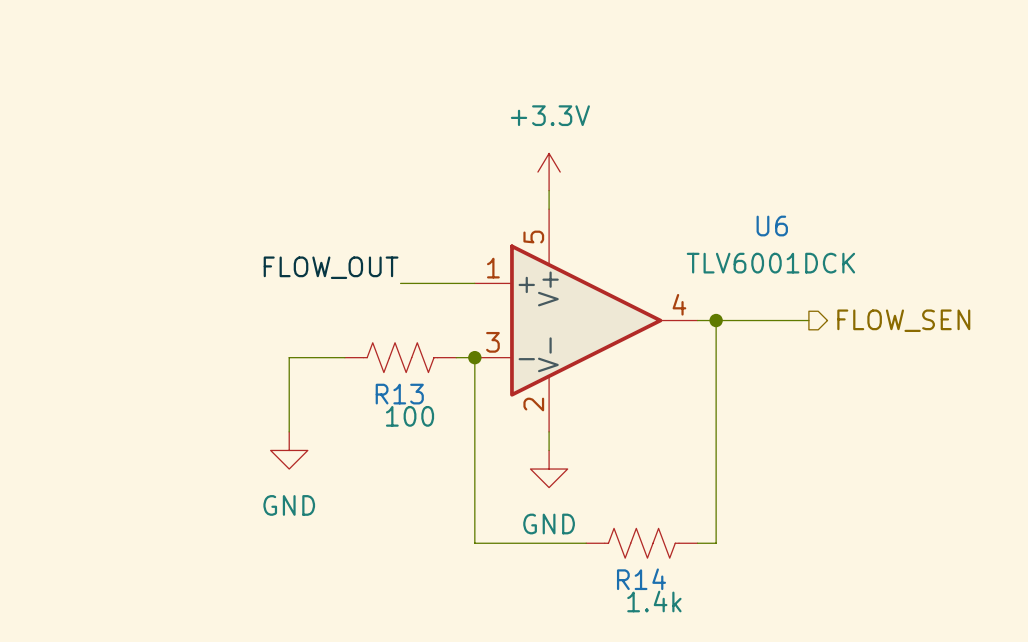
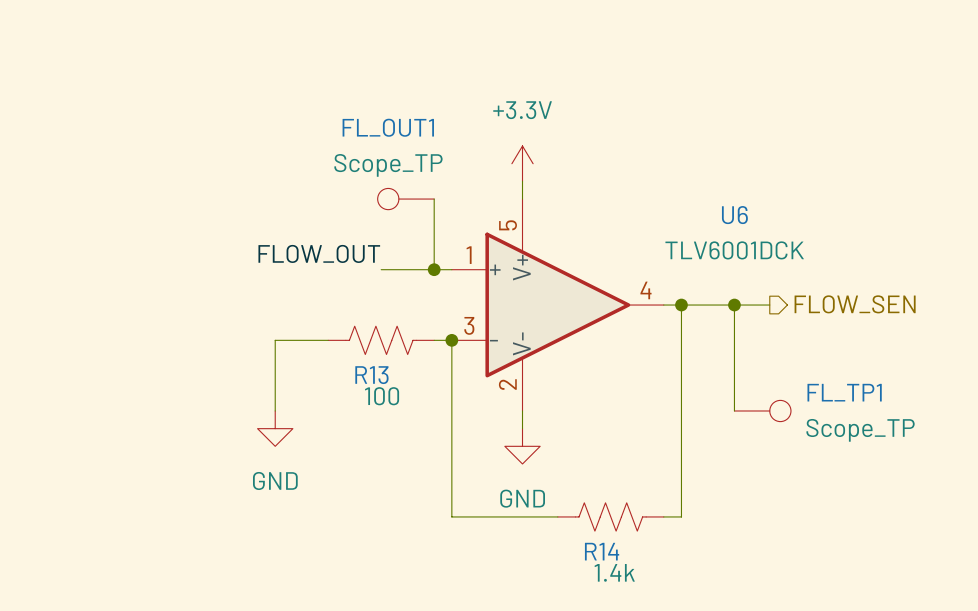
FL_OUT1: none -> Scope_TP (405, 199)
wire: none -> (434, 199) (434, 269)
junction: none -> (434, 269)
wire: none -> (734, 305) (734, 410)
junction: none -> (734, 305)
FL_TP1: none -> Scope_TP (762, 410)

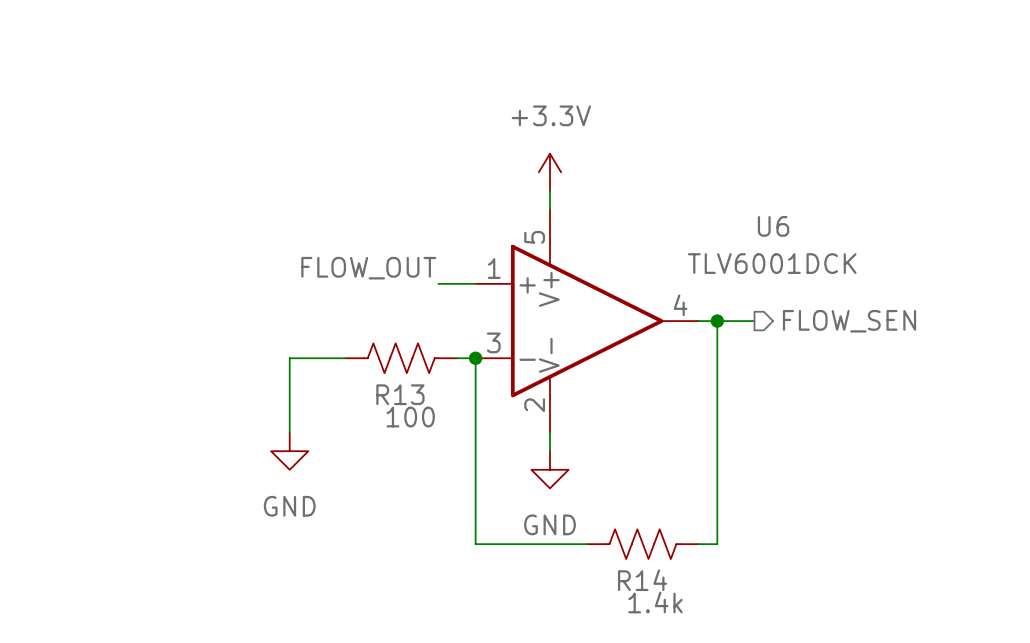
FL_OUT1: Scope_TP (405, 199) -> none
wire: (434, 199) (434, 269) -> none
label position: FLOW_OUT (319, 253) -> FLOW_OUT (368, 268)
wire: (381, 269) (416, 269) -> none
junction: (434, 269) -> none
hierarchical label position: FLOW_SEN (855, 304) -> FLOW_SEN (849, 321)
wire: (716, 305) (769, 305) -> none
wire: (734, 305) (734, 410) -> none
junction: (734, 305) -> none
FL_TP1: Scope_TP (762, 410) -> none

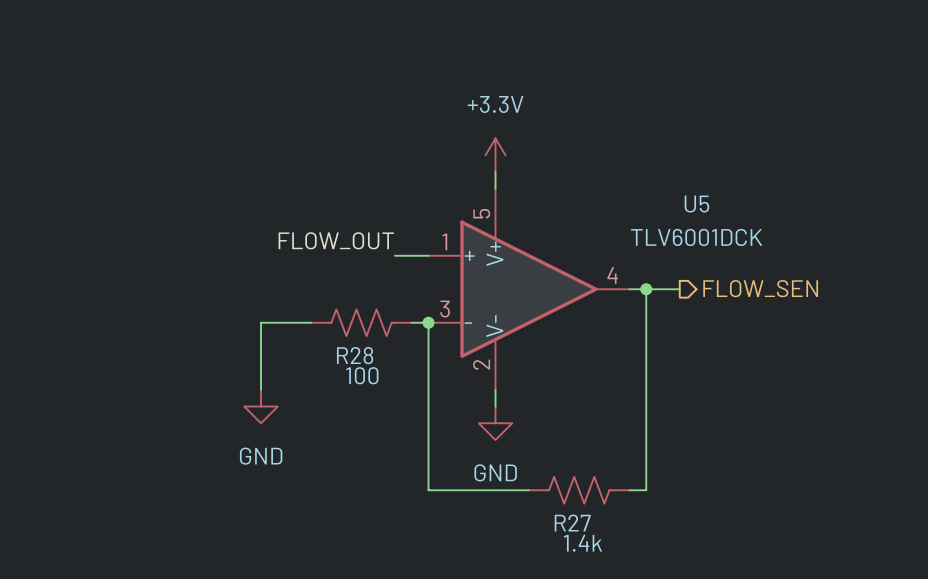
U6 name: U6 (773, 226) -> U5 (696, 204)
R13 name: R13 (400, 394) -> R28 (355, 355)
R14 name: R14 (642, 580) -> R27 (572, 523)

